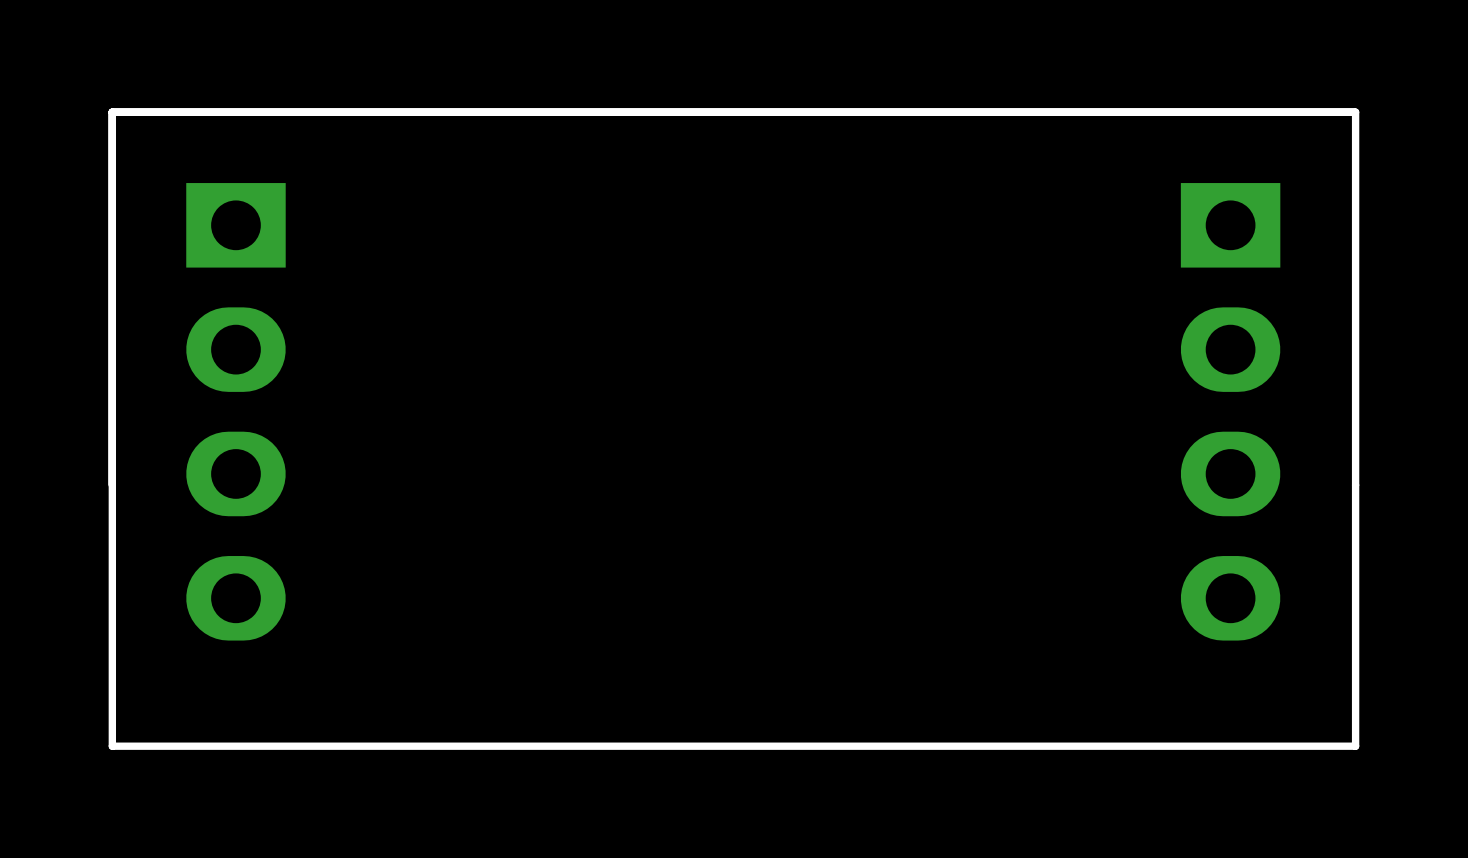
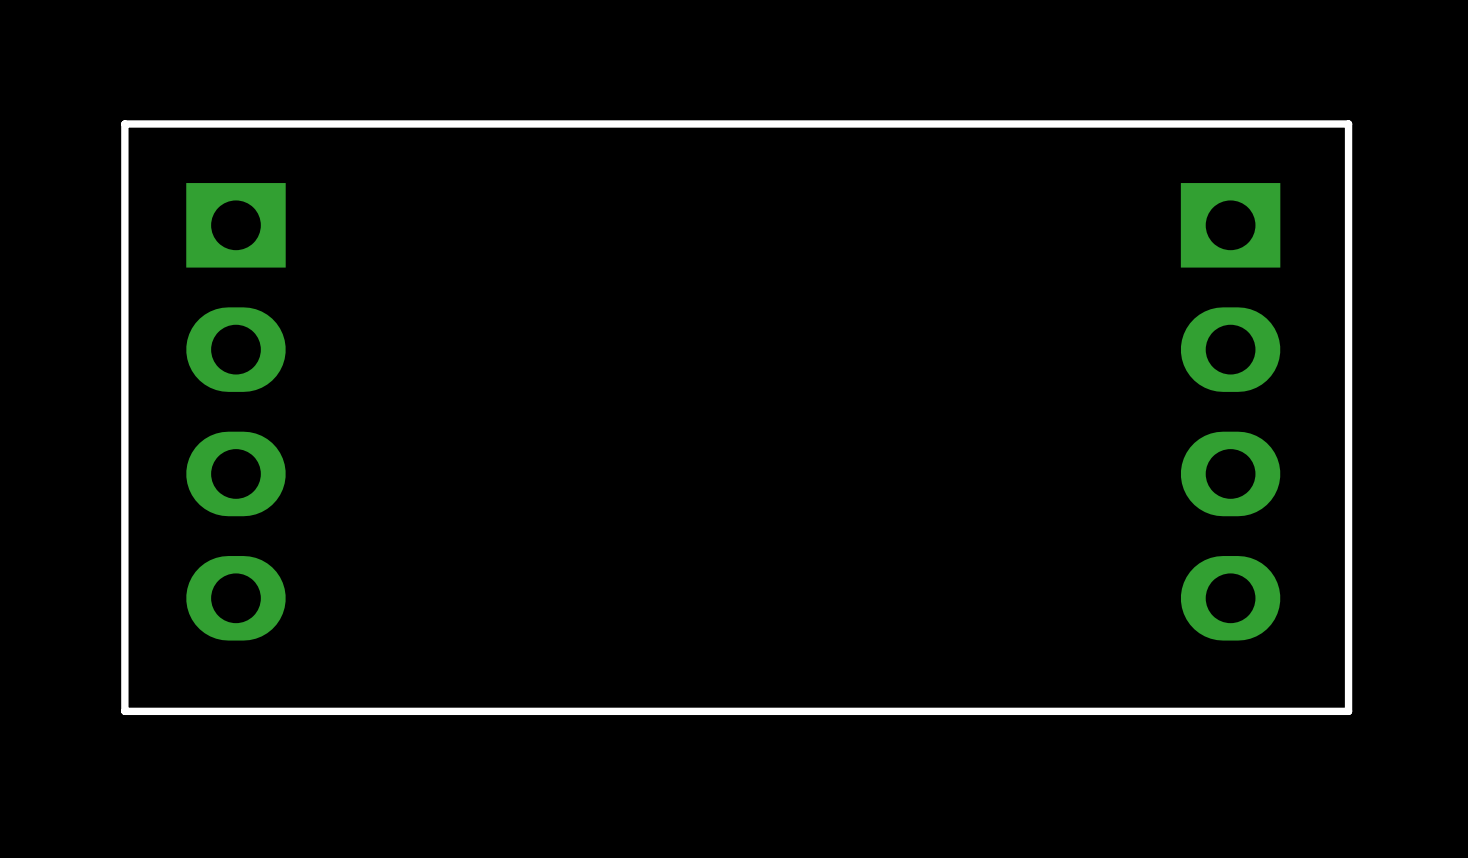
board edge: (1355, 112) (1355, 746) (112, 746) (112, 112) (1355, 112) -> (1348, 123) (1348, 711) (124, 711) (124, 123) (1348, 123)

